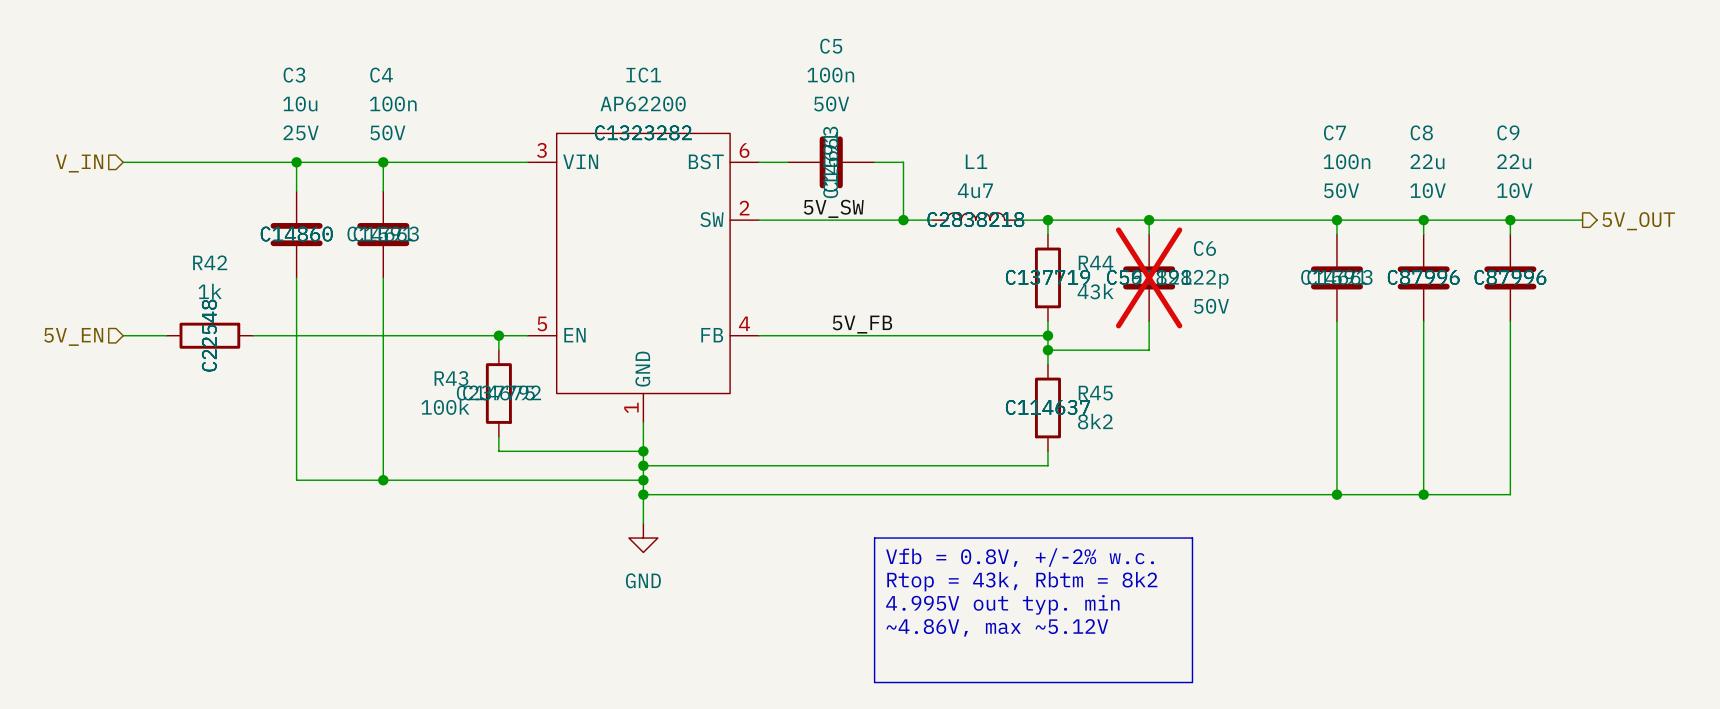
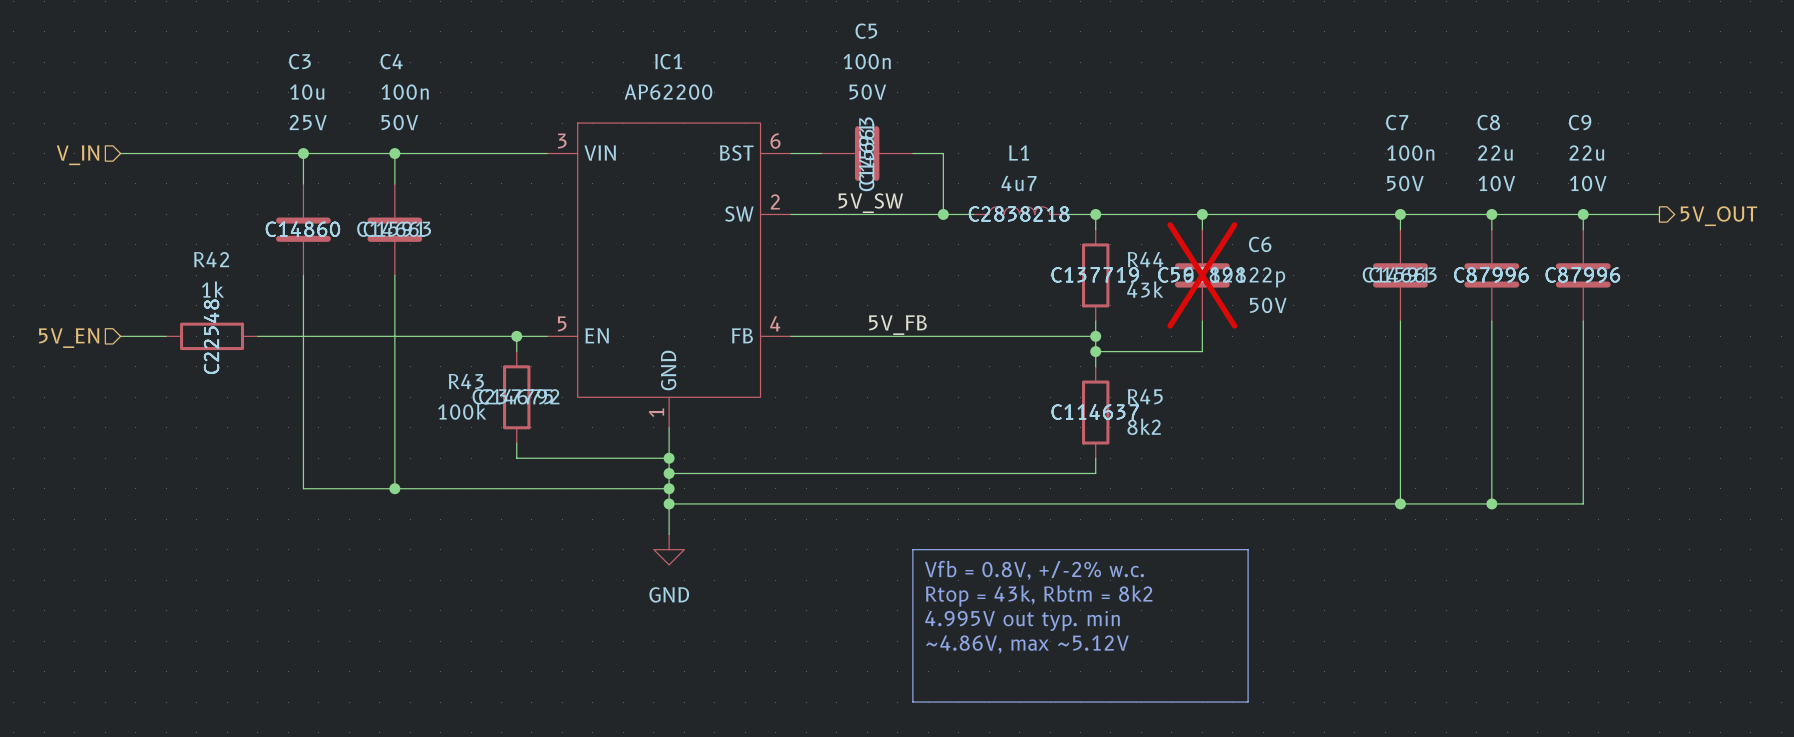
IC1 text: C1323282 (643, 132) -> none
IC1 text: C1323282 (643, 132) -> none

